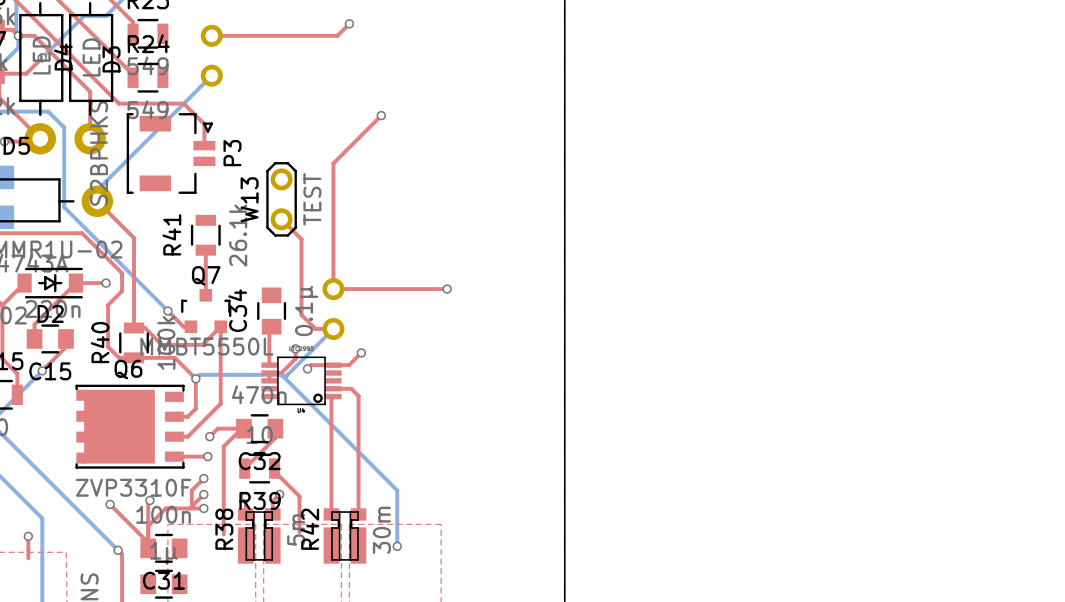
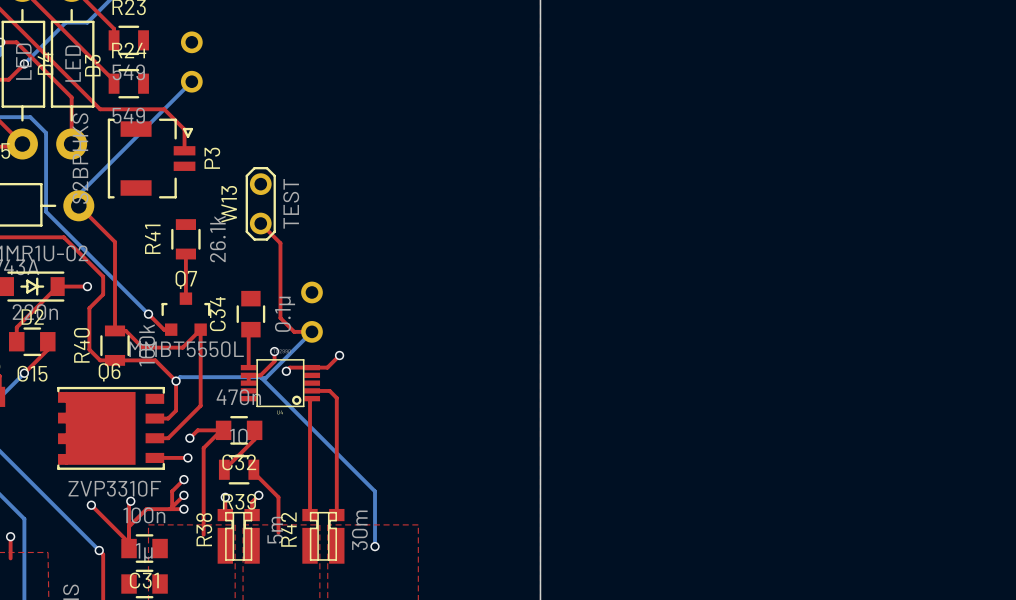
top track: (349, 23) (337, 35) (211, 35) -> none
via: (349, 23) -> none
top track: (381, 115) (333, 163) (333, 289) (447, 289) -> none
via: (381, 115) -> none
via: (447, 289) -> none

